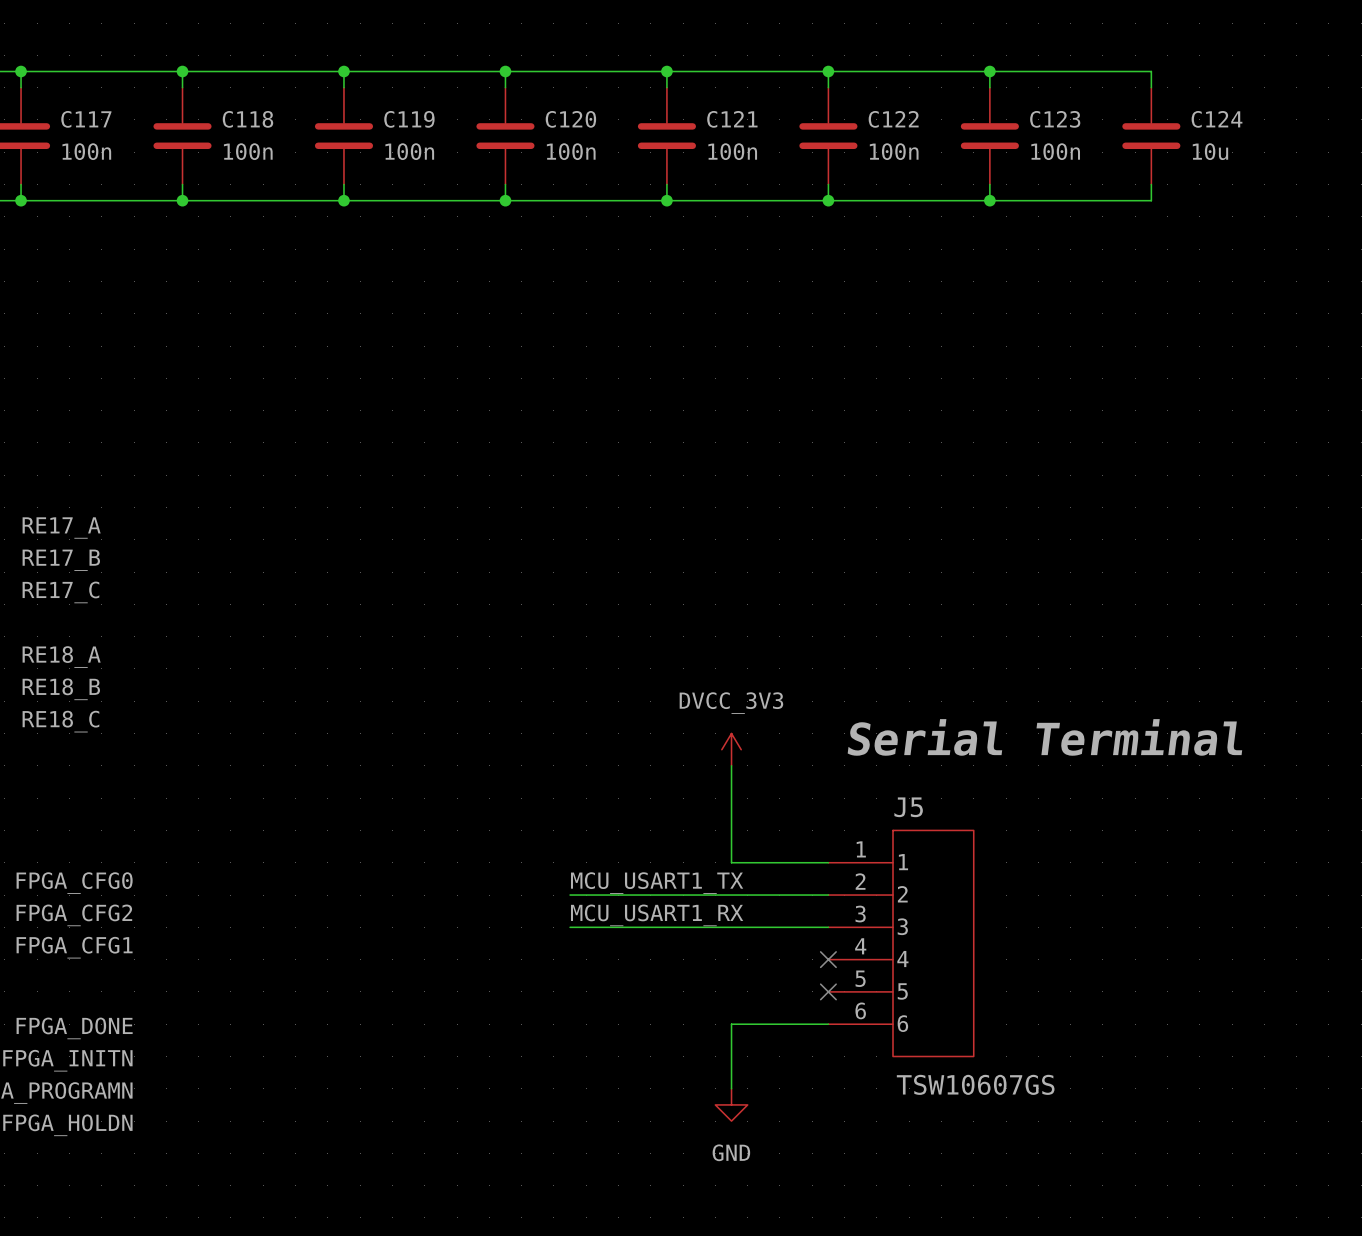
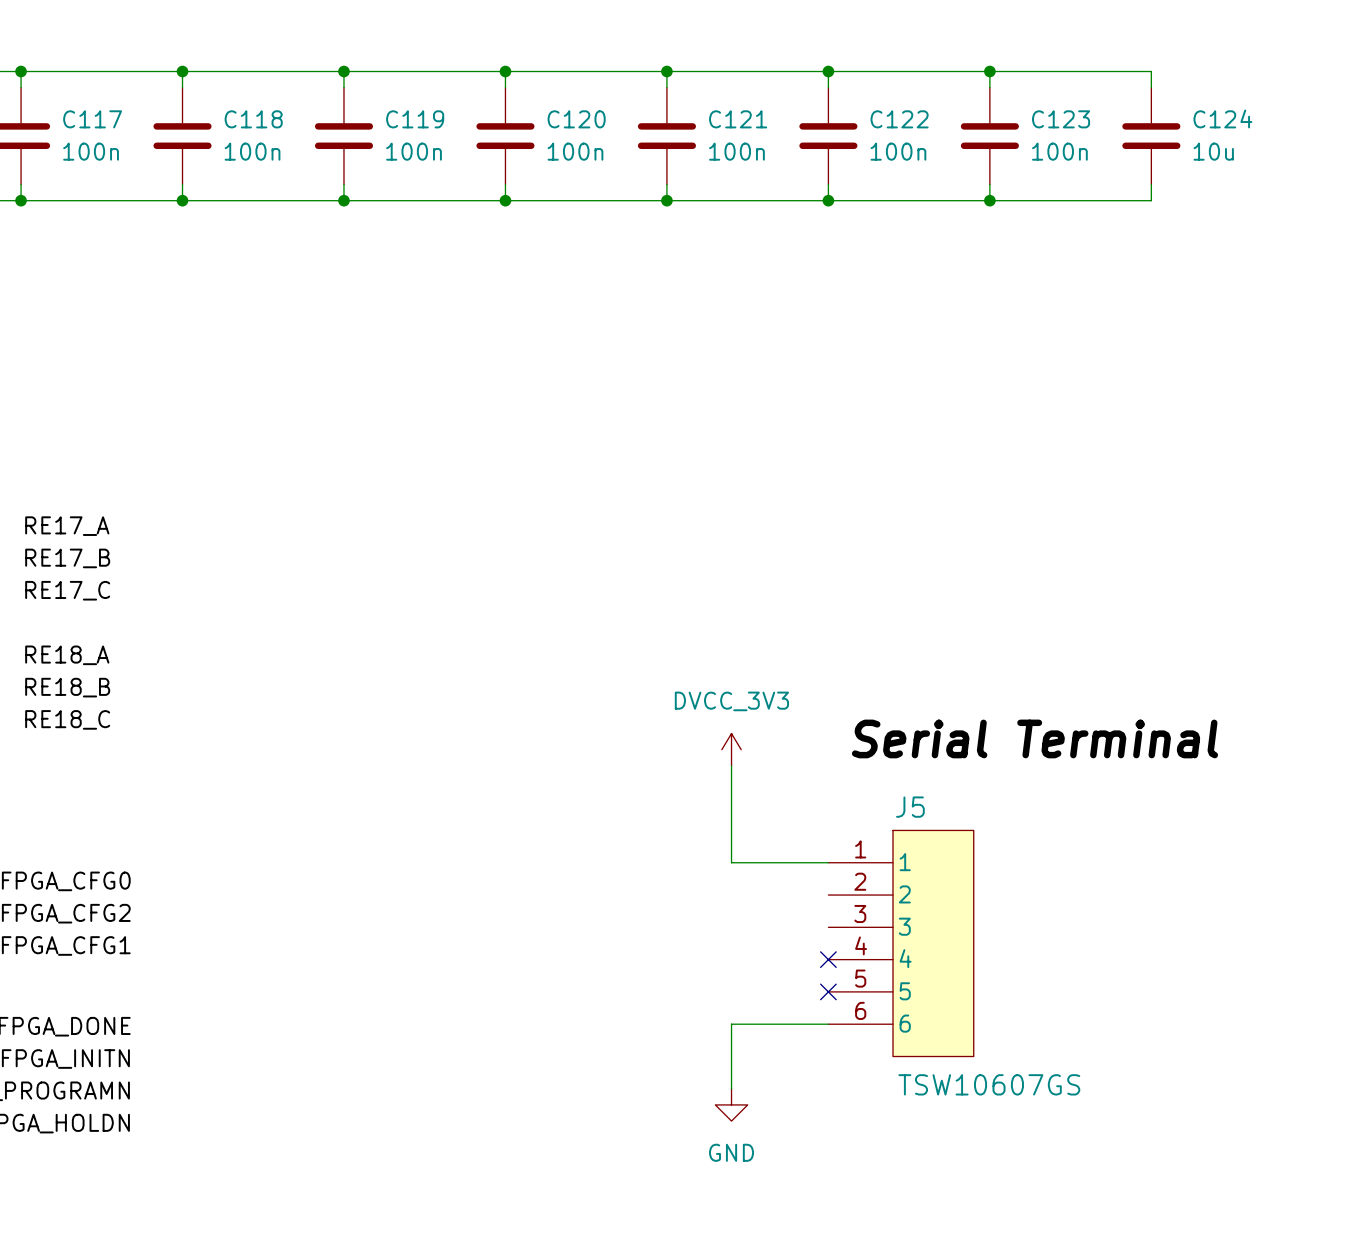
label: MCU_USART1_TX (657, 883) -> none
wire: (570, 895) (828, 895) -> none
label: MCU_USART1_RX (657, 915) -> none
wire: (570, 927) (828, 927) -> none

